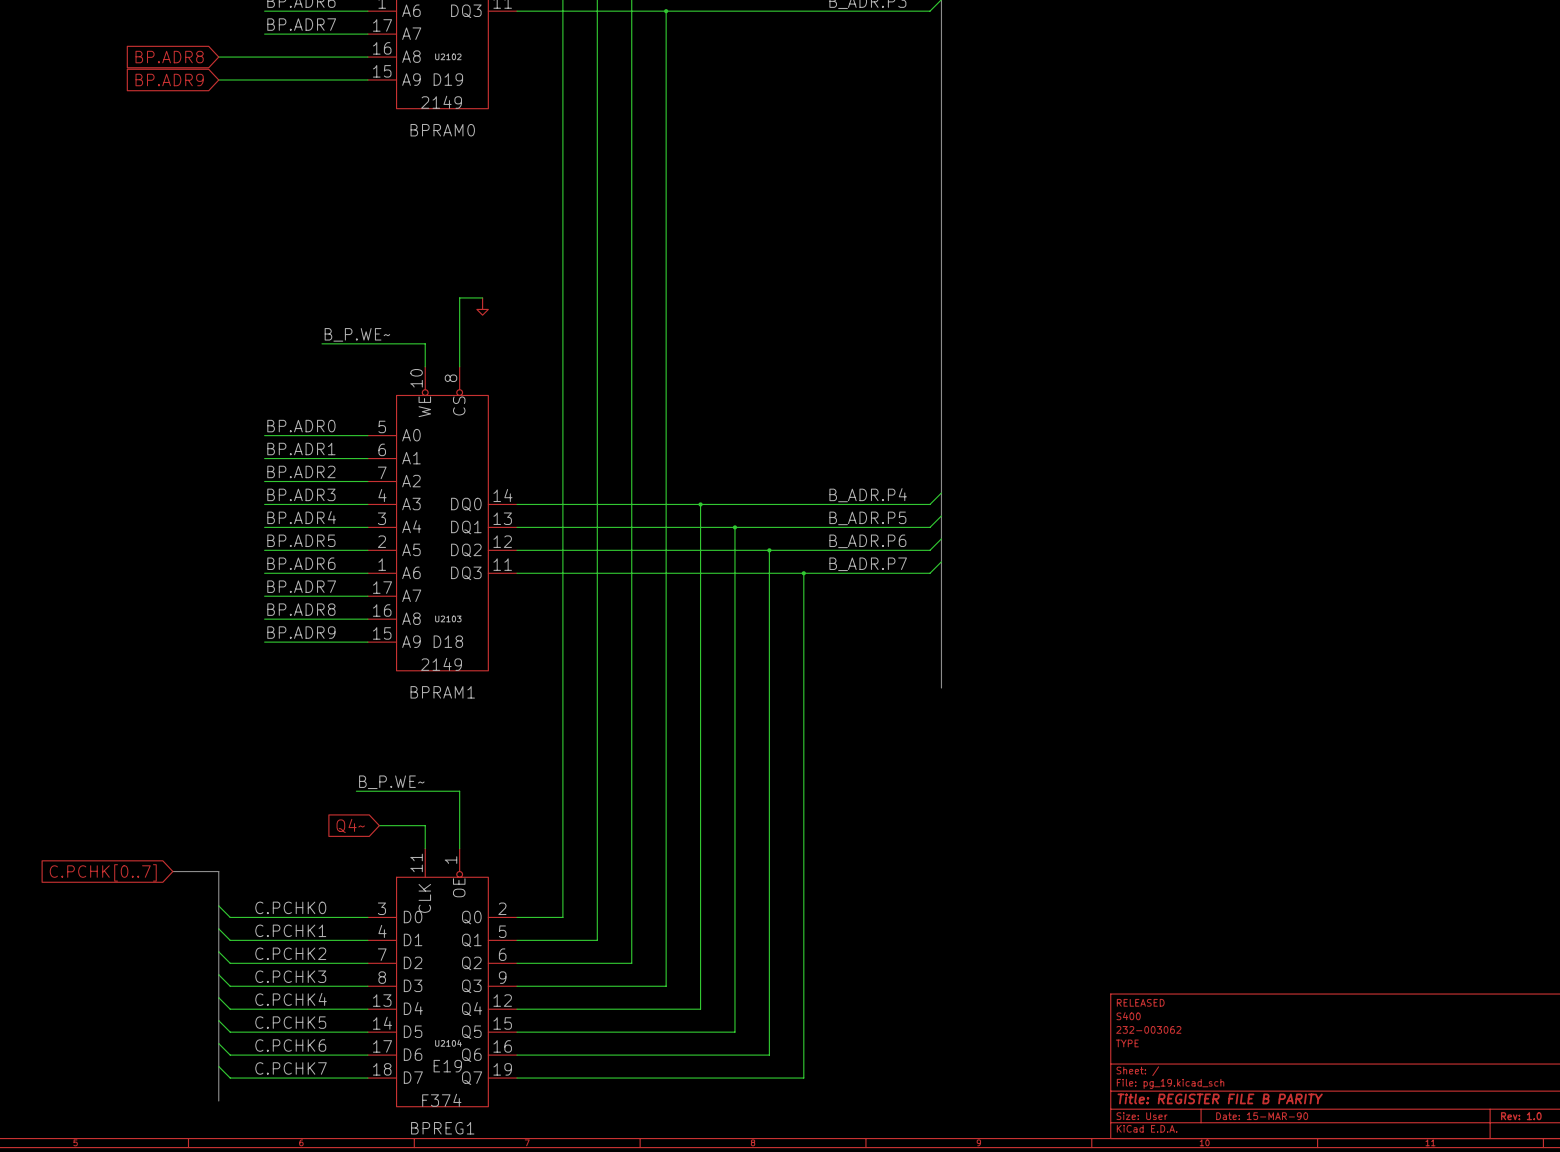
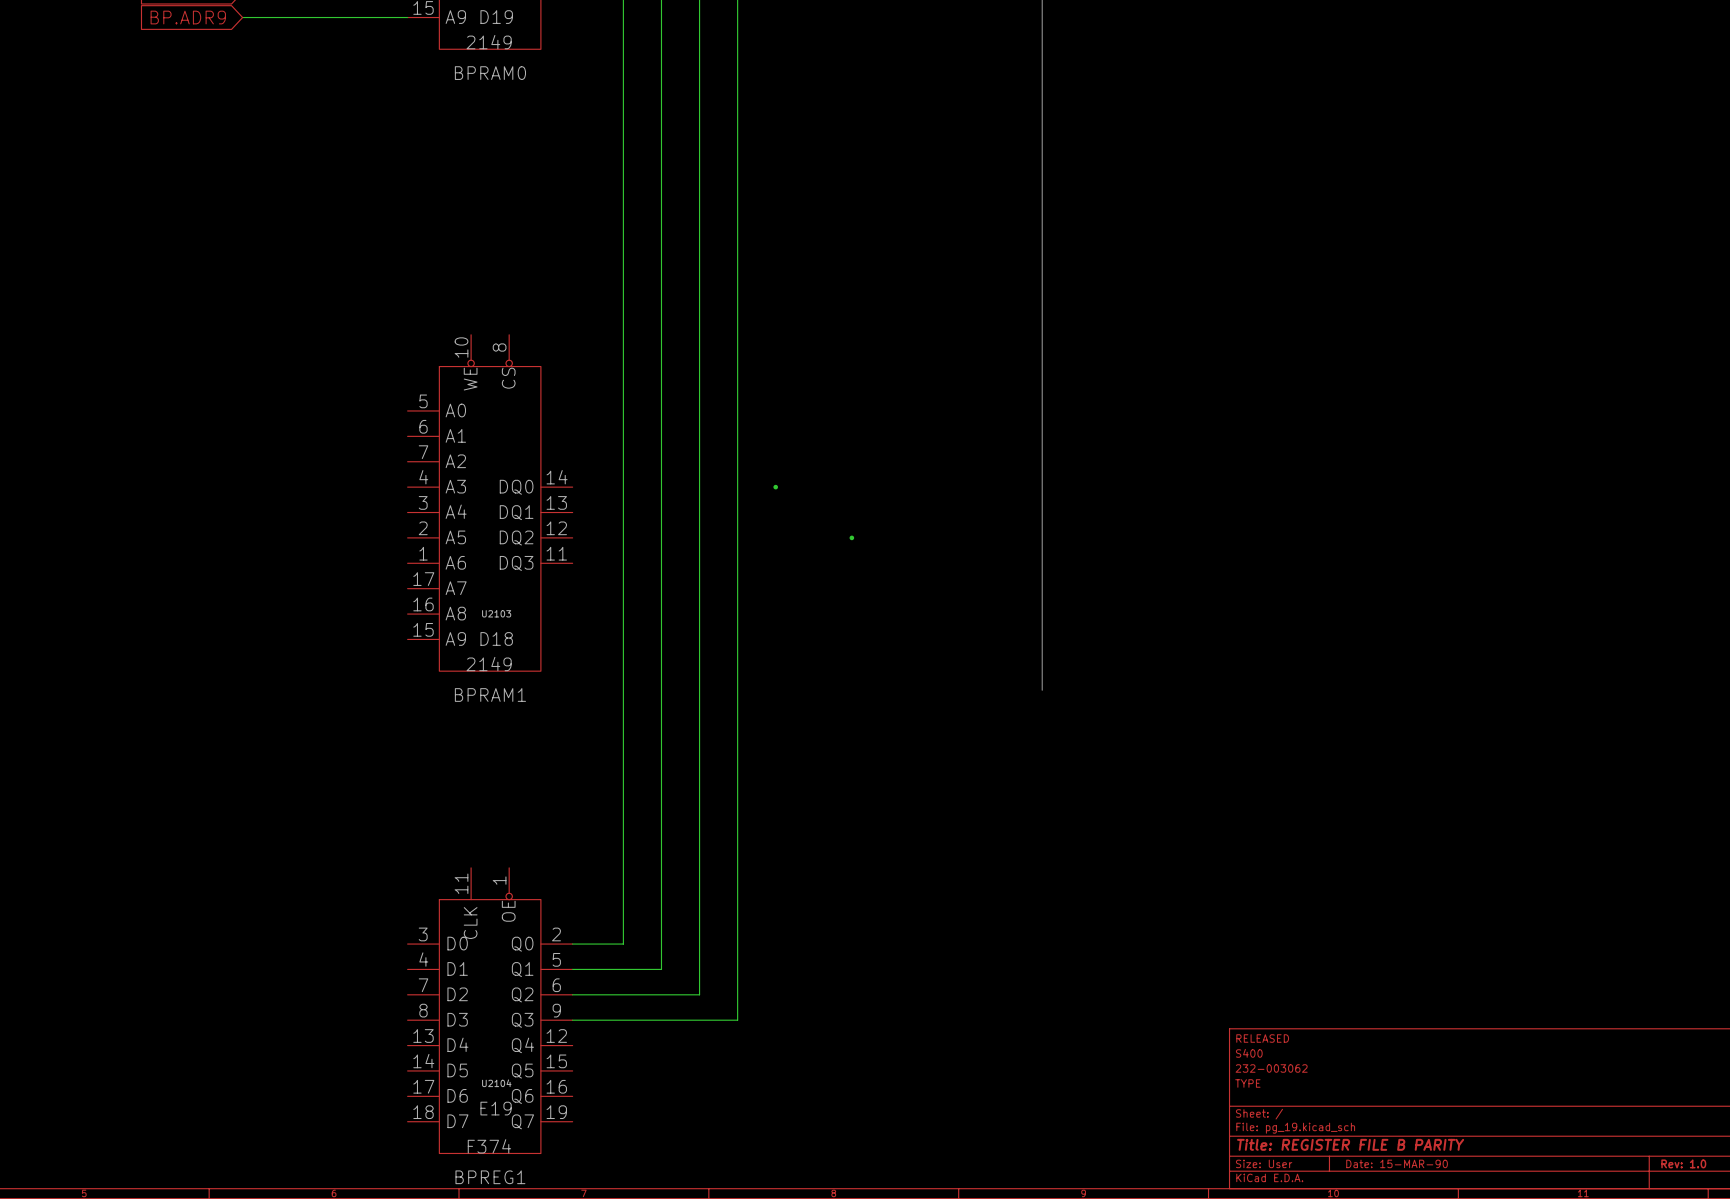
wire: (482, 297) (459, 297) (459, 366) -> none
power symbol: (482, 306) -> none
label: B_P.WE~ (357, 334) -> none
wire: (321, 343) (425, 343) (425, 366) -> none
label: BP.ADR0 (301, 426) -> none
wire: (264, 435) (367, 435) -> none
label: BP.ADR1 (301, 449) -> none
wire: (264, 458) (367, 458) -> none
label: BP.ADR2 (301, 471) -> none
wire: (264, 481) (367, 481) -> none
wire: (941, 492) (929, 504) (517, 504) -> none
label: BP.ADR3 (301, 494) -> none
label: B_ADR.P4 (868, 495) -> none
wire: (264, 504) (367, 504) -> none
wire: (700, 504) (700, 1009) (517, 1009) -> none
wire: (941, 515) (929, 527) (517, 527) -> none
label: BP.ADR4 (301, 517) -> none
label: B_ADR.P5 (867, 518) -> none
wire: (264, 527) (367, 527) -> none
wire: (734, 527) (734, 1032) (517, 1032) -> none
junction: (734, 527) -> none
wire: (941, 538) (929, 550) (517, 550) -> none
label: BP.ADR5 (301, 540) -> none
label: B_ADR.P6 (867, 541) -> none
wire: (264, 550) (367, 550) -> none
wire: (769, 550) (769, 1055) (517, 1055) -> none
wire: (941, 561) (929, 573) (517, 573) -> none
label: BP.ADR6 (301, 563) -> none
label: B_ADR.P7 (868, 564) -> none
wire: (264, 573) (367, 573) -> none
wire: (803, 573) (803, 1078) (517, 1078) -> none
junction: (803, 573) -> none
label: BP.ADR7 (301, 586) -> none
wire: (264, 596) (367, 596) -> none
label: BP.ADR8 (301, 609) -> none
wire: (264, 619) (367, 619) -> none
label: BP.ADR9 (301, 632) -> none
wire: (264, 642) (367, 642) -> none
label: B_P.WE~ (391, 782) -> none
wire: (356, 791) (459, 791) (459, 848) -> none
global label: Q4~ (350, 825) -> none
wire: (379, 825) (425, 825) (425, 848) -> none
bus: (172, 871) (218, 871) (218, 1100) -> none
global label: C.PCHK[0..7] (103, 872) -> none
wire: (218, 905) (230, 917) (367, 917) -> none
label: C.PCHK0 (290, 907) -> none
wire: (218, 928) (230, 940) (367, 940) -> none
label: C.PCHK1 (290, 930) -> none
wire: (218, 951) (230, 963) (367, 963) -> none
label: C.PCHK2 (290, 953) -> none
wire: (218, 974) (230, 986) (367, 986) -> none
label: C.PCHK3 (290, 976) -> none
wire: (218, 997) (230, 1009) (367, 1009) -> none
label: C.PCHK4 (291, 999) -> none
wire: (218, 1020) (230, 1032) (367, 1032) -> none
label: C.PCHK5 (290, 1022) -> none
wire: (218, 1043) (230, 1055) (367, 1055) -> none
label: C.PCHK6 (290, 1045) -> none
wire: (218, 1066) (230, 1078) (367, 1078) -> none
label: C.PCHK7 (291, 1068) -> none

